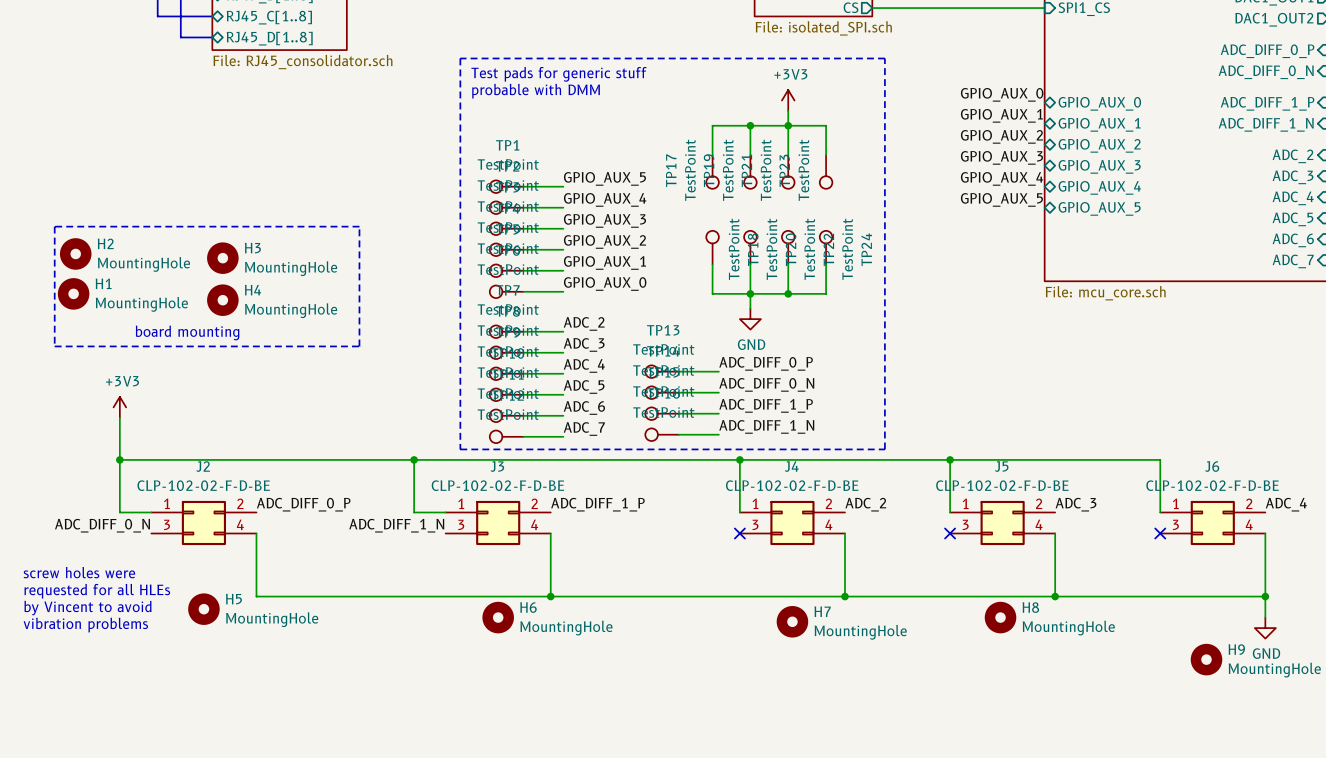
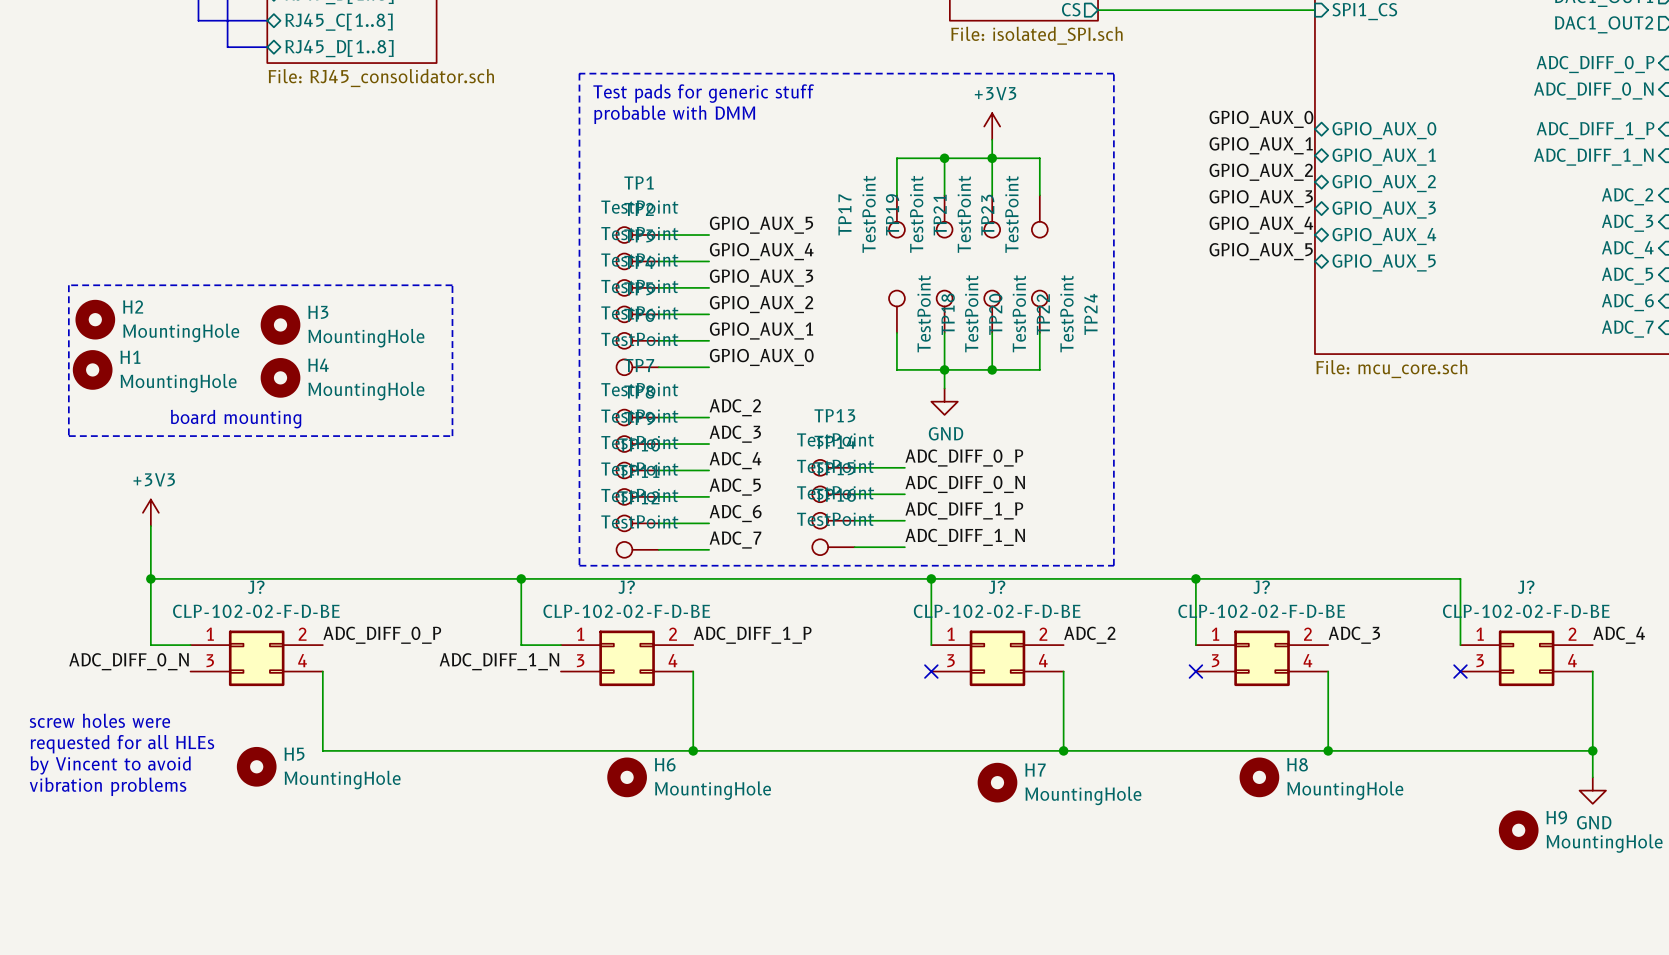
J2 name: J2 (203, 466) -> J? (256, 587)
J3 name: J3 (497, 466) -> J? (626, 587)
J4 name: J4 (791, 466) -> J? (997, 587)
J5 name: J5 (1001, 466) -> J? (1261, 587)
J6 name: J6 (1212, 466) -> J? (1526, 587)

